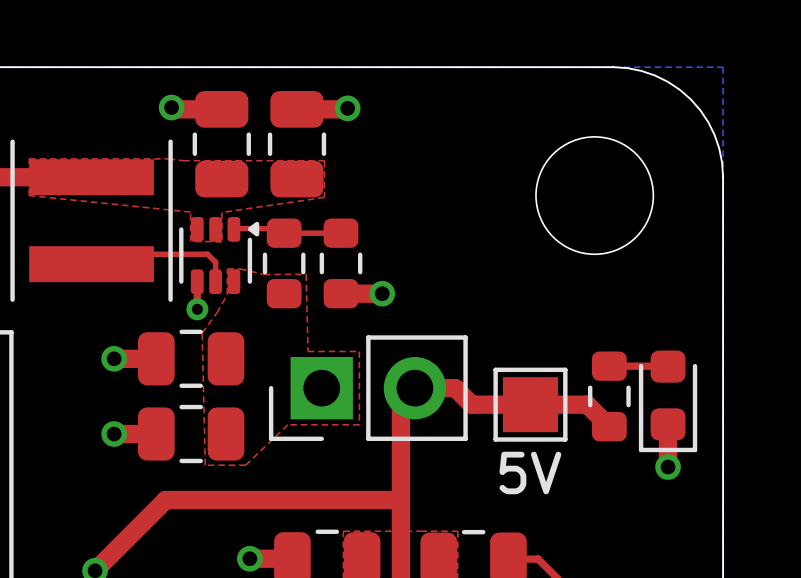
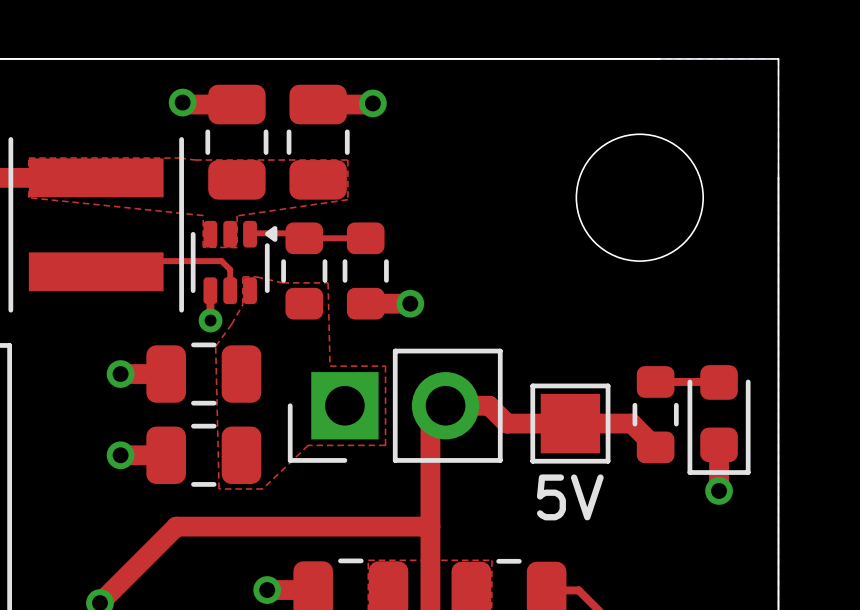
board edge: (613, 67) (641, 70) (655, 75) (680, 89) (690, 99) (708, 122) (714, 135) (719, 148) (723, 177) -> (659, 58) (778, 58) (778, 177)

